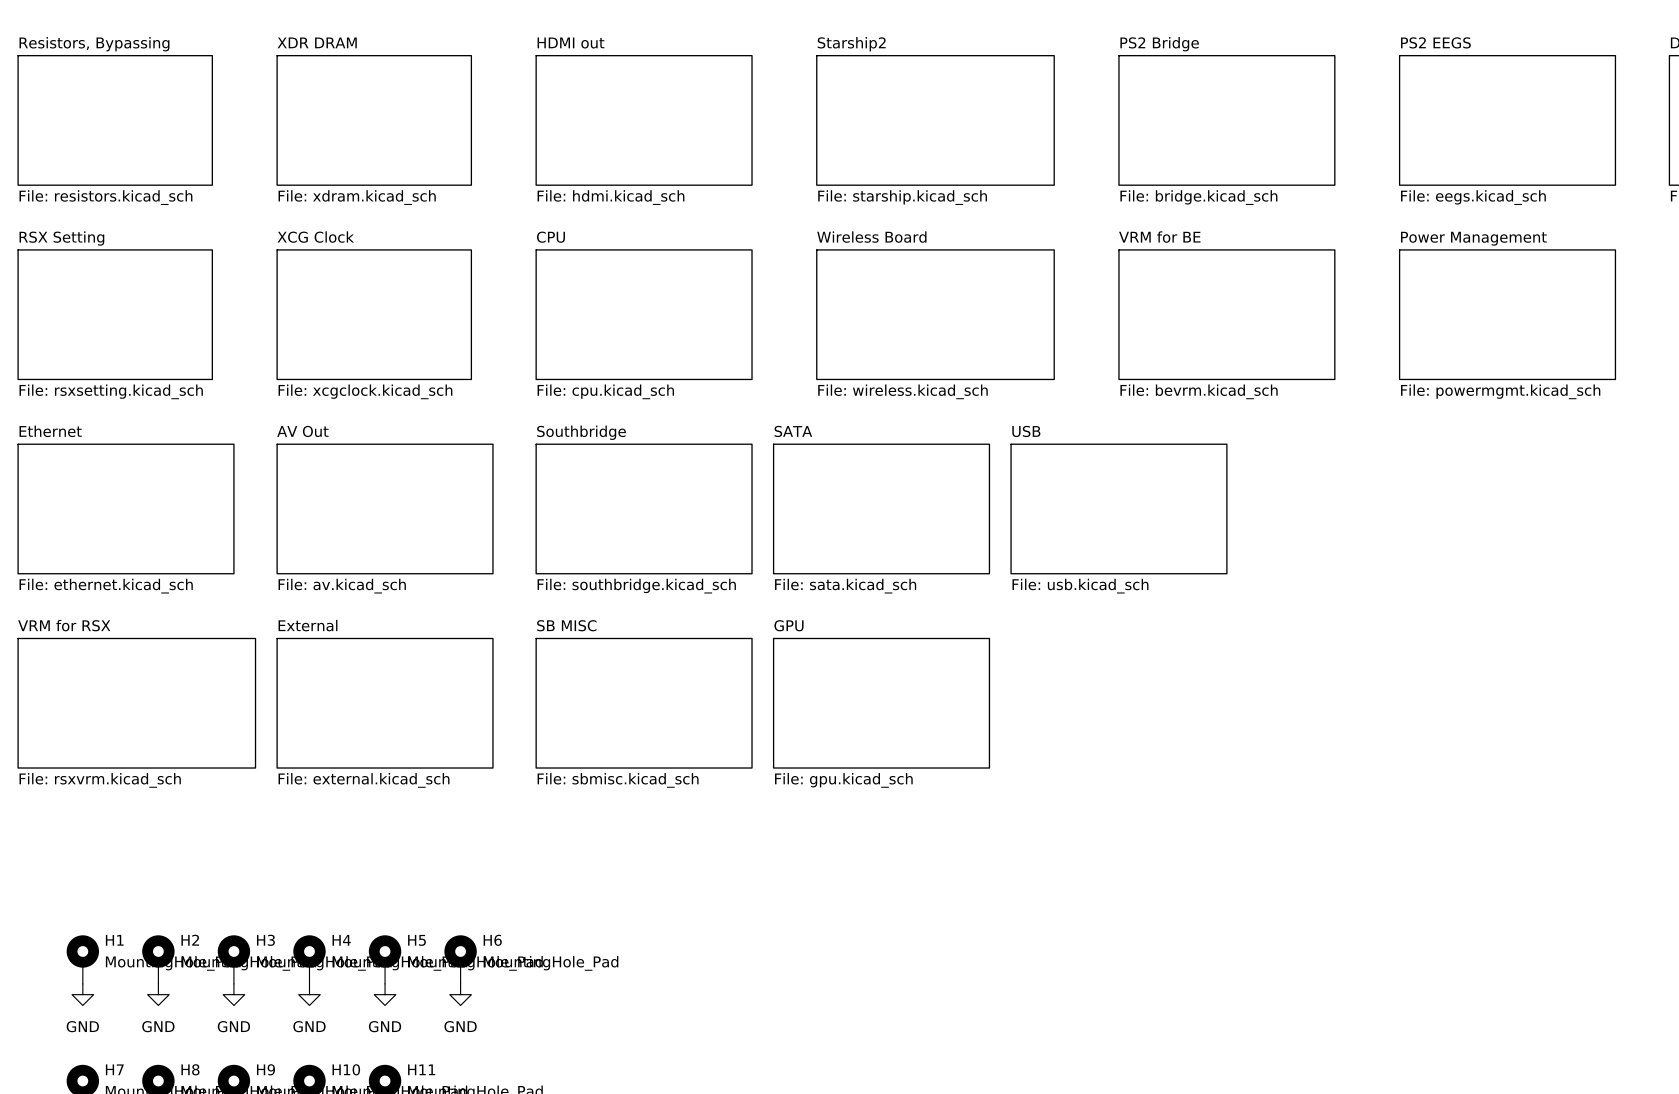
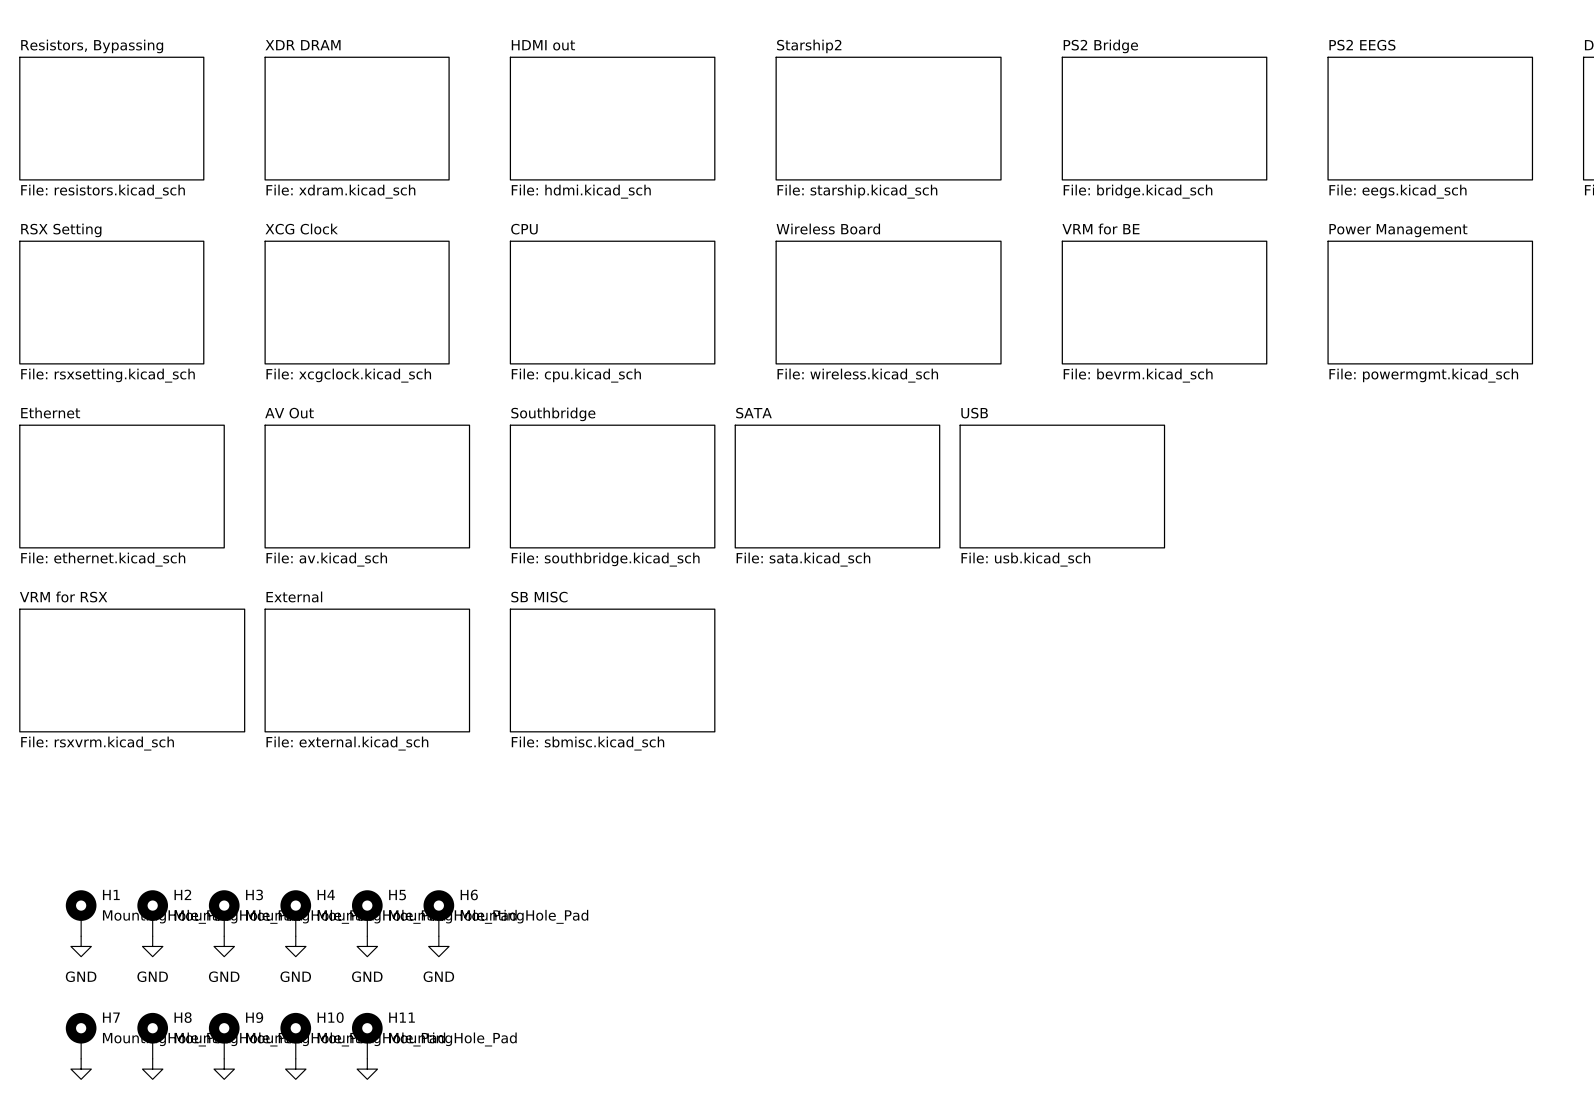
sheet GPU: File: gpu.kicad_sch (881, 703) -> none

